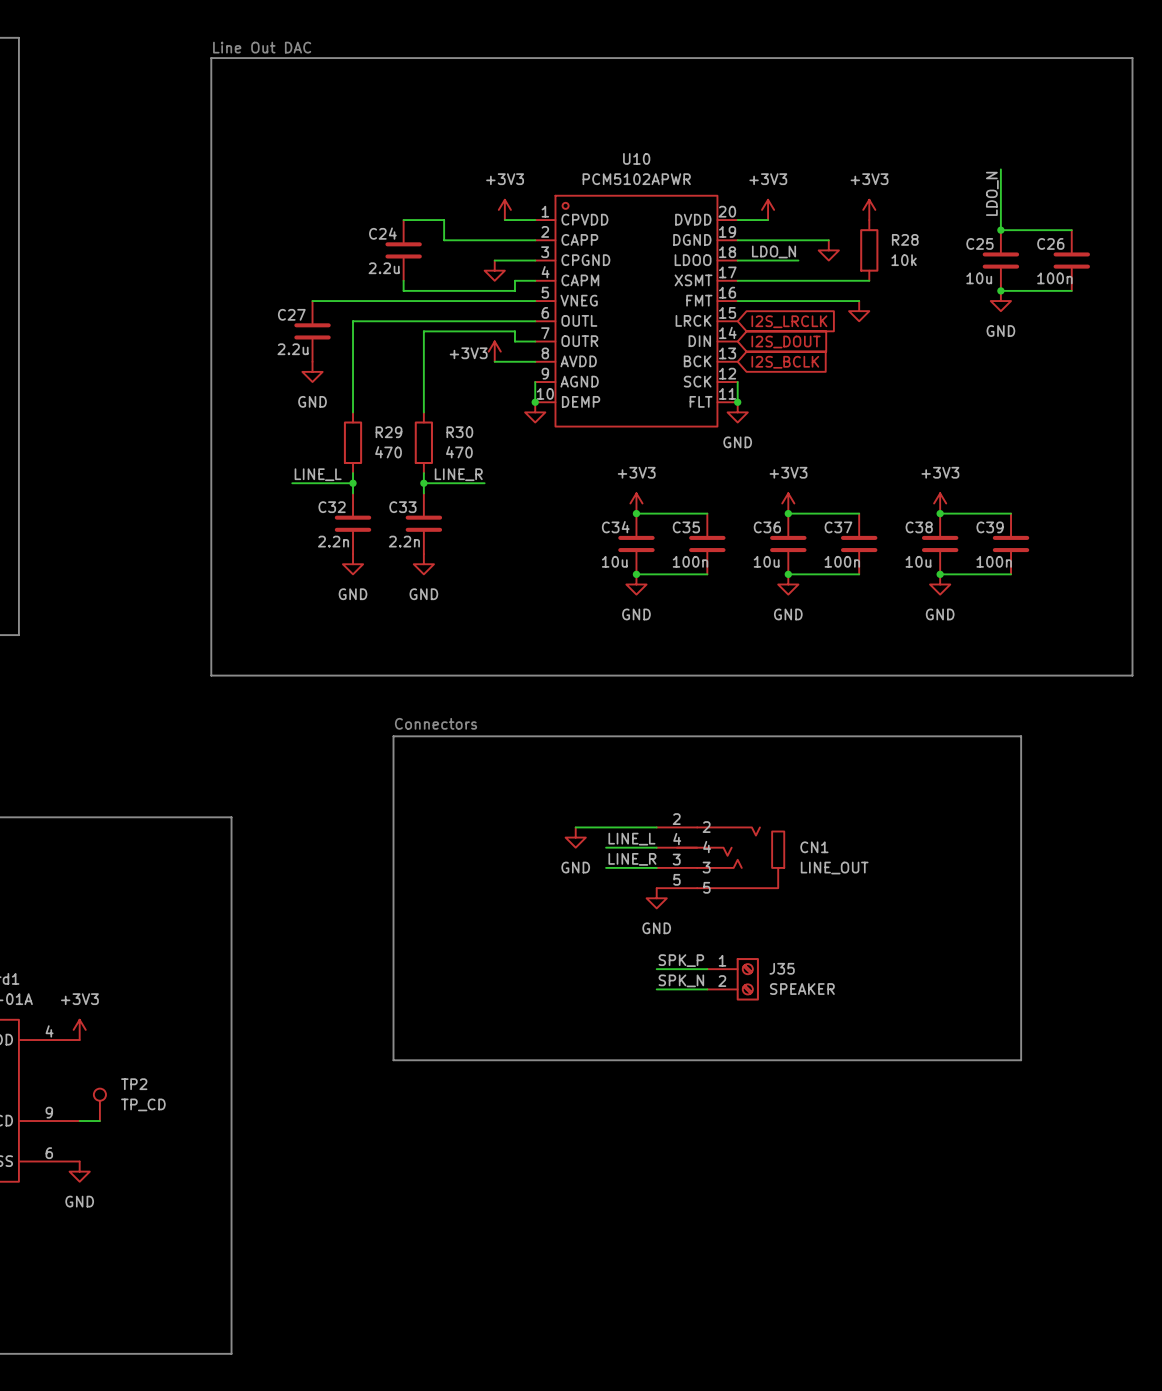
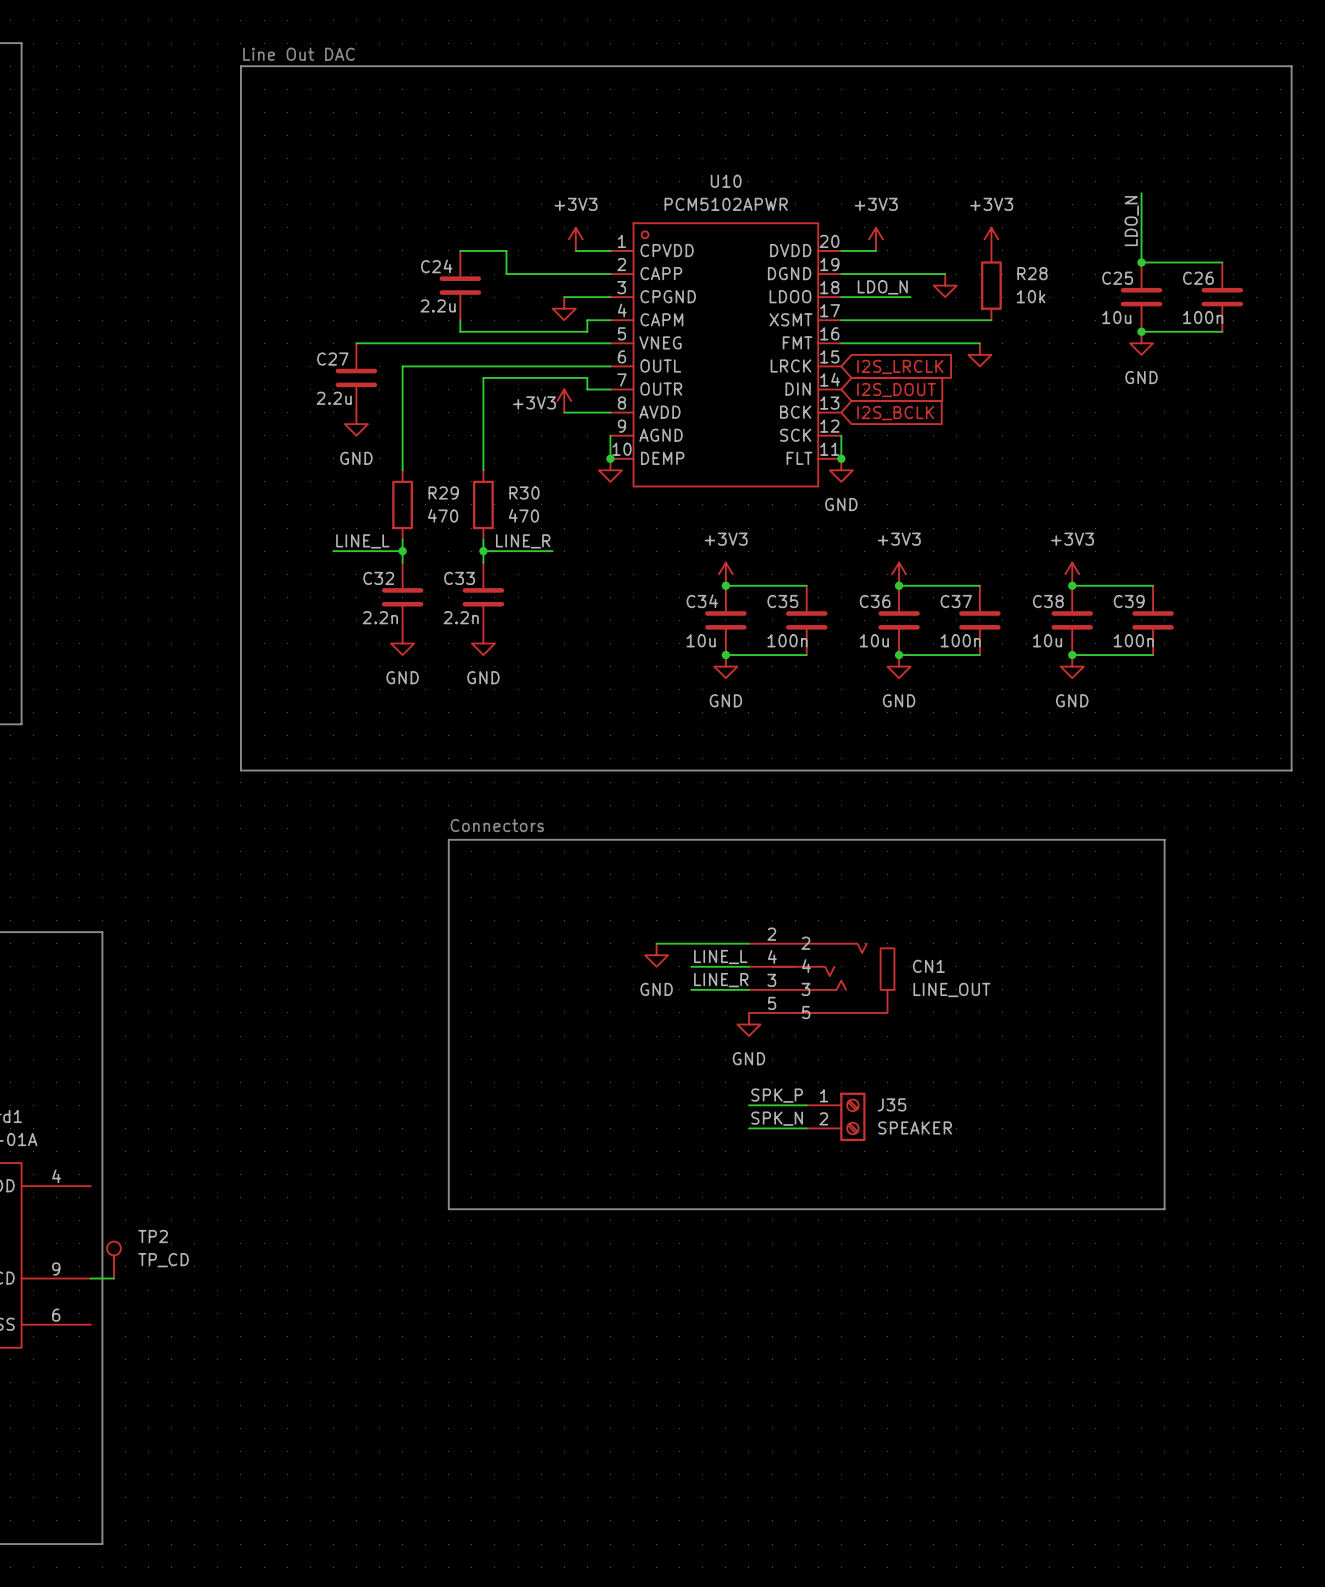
line: (89, 817) (231, 817) (231, 1353) (89, 1353) -> (102, 932) (102, 1544)
power symbol: +3V3 (79, 1029) -> none
power symbol: GND (79, 1171) -> none

